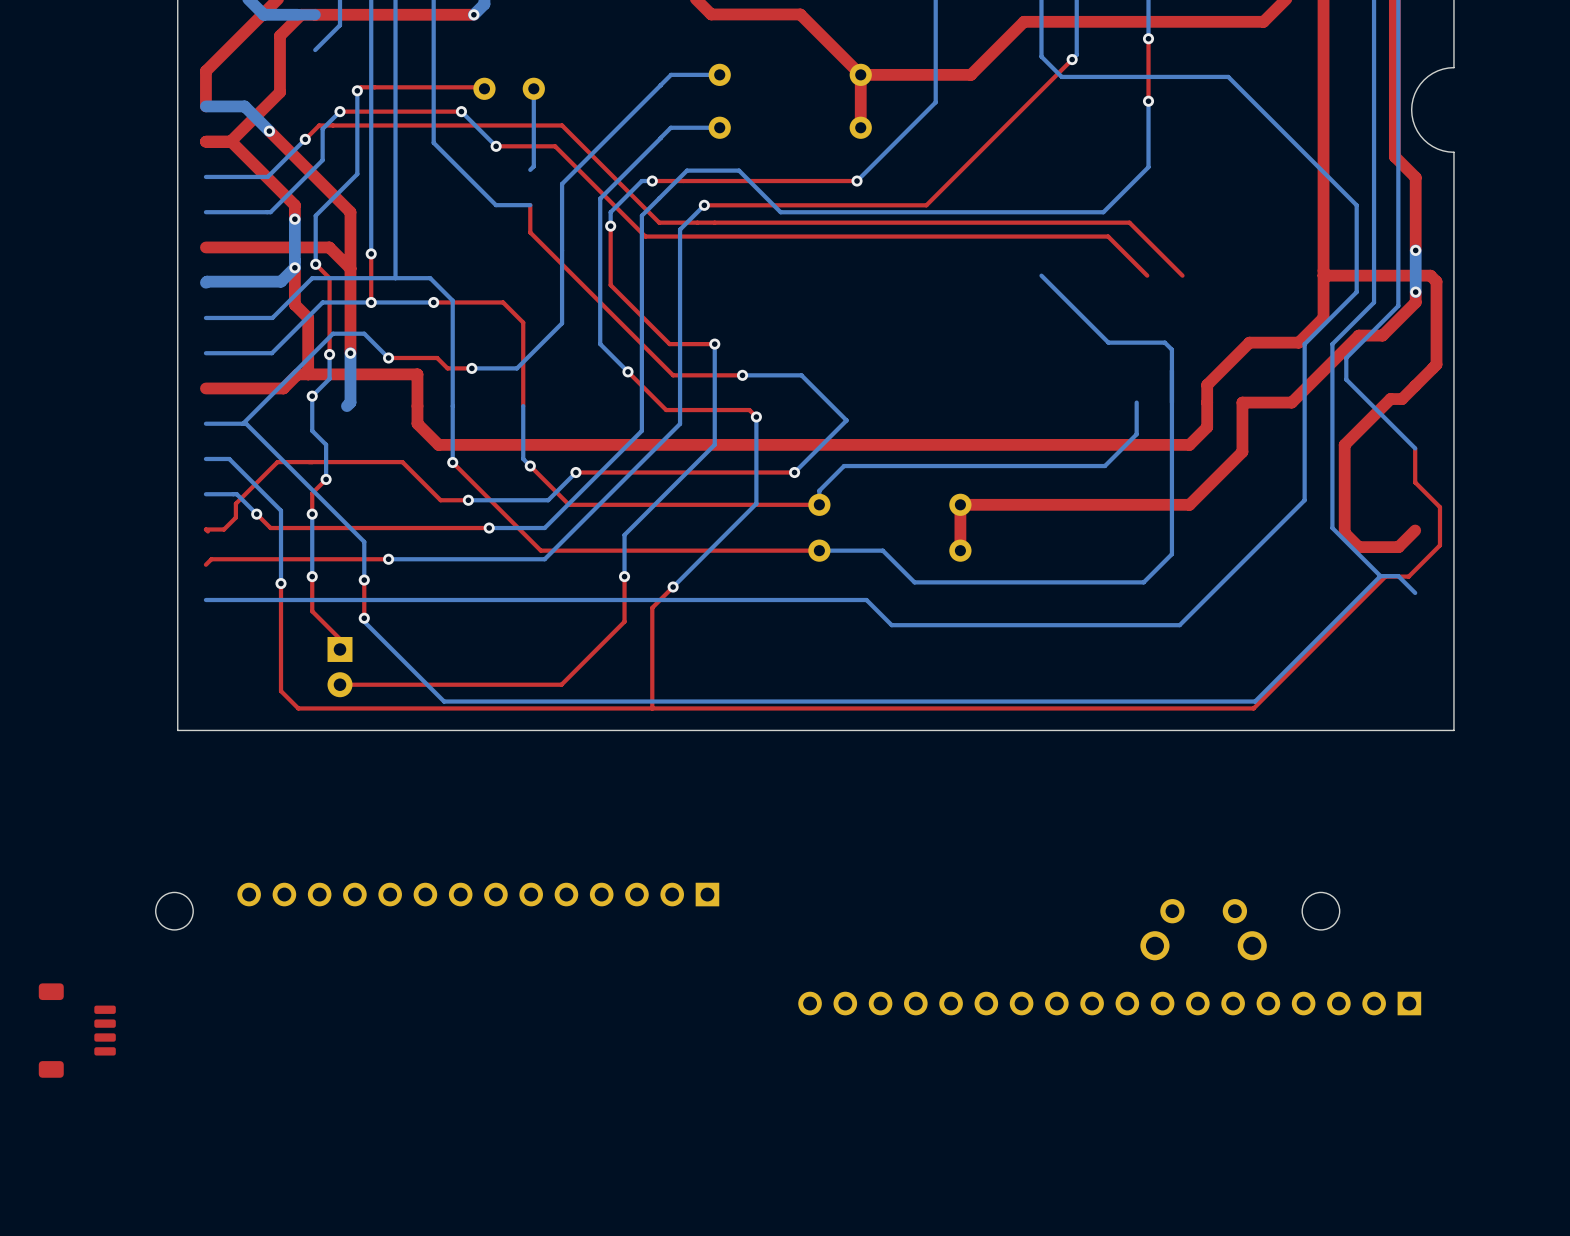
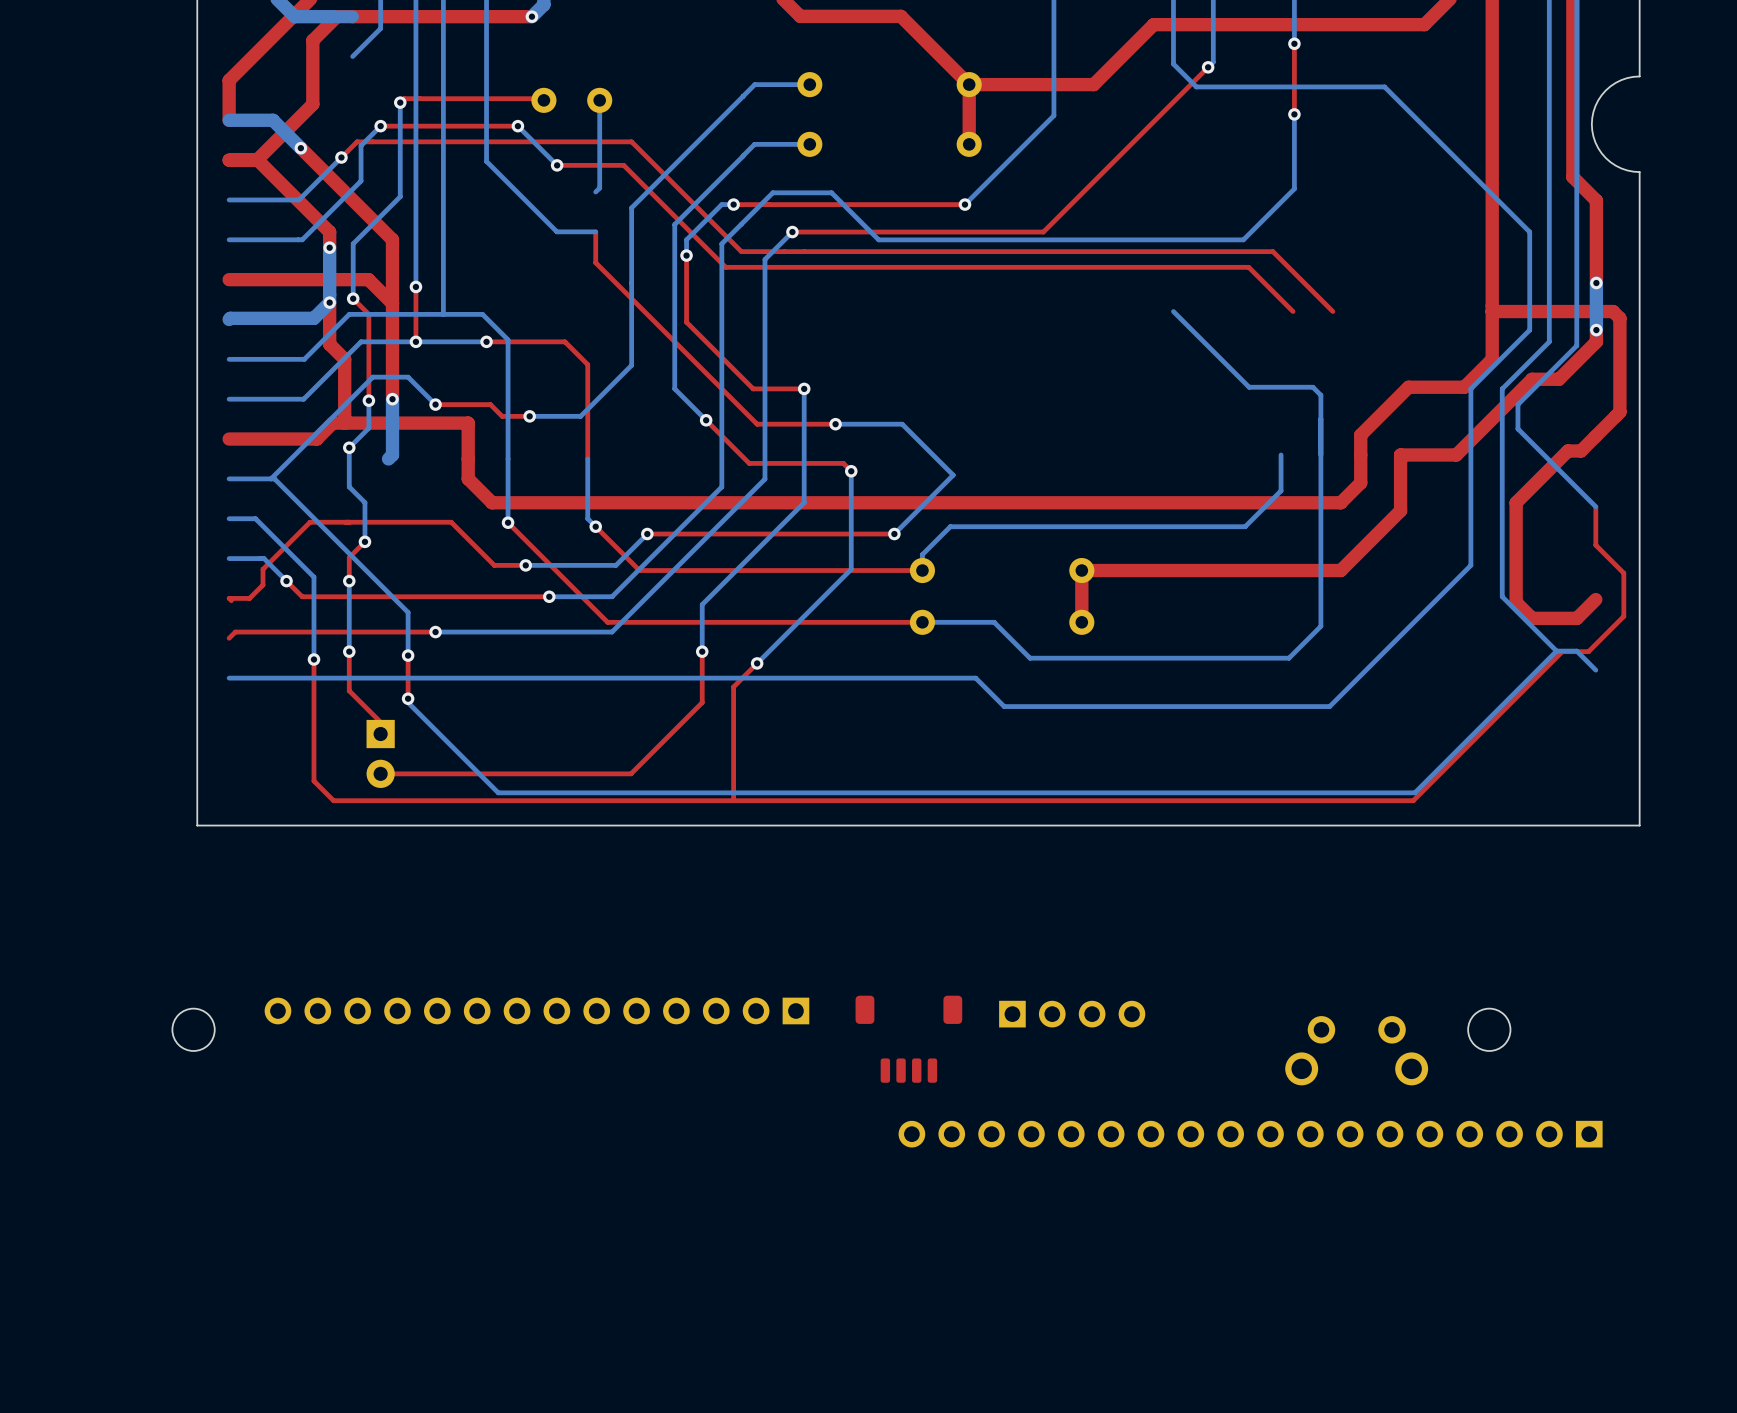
part: none -> (1072, 1014)
part: none -> (908, 1039)
part: (77, 1030) -> none

